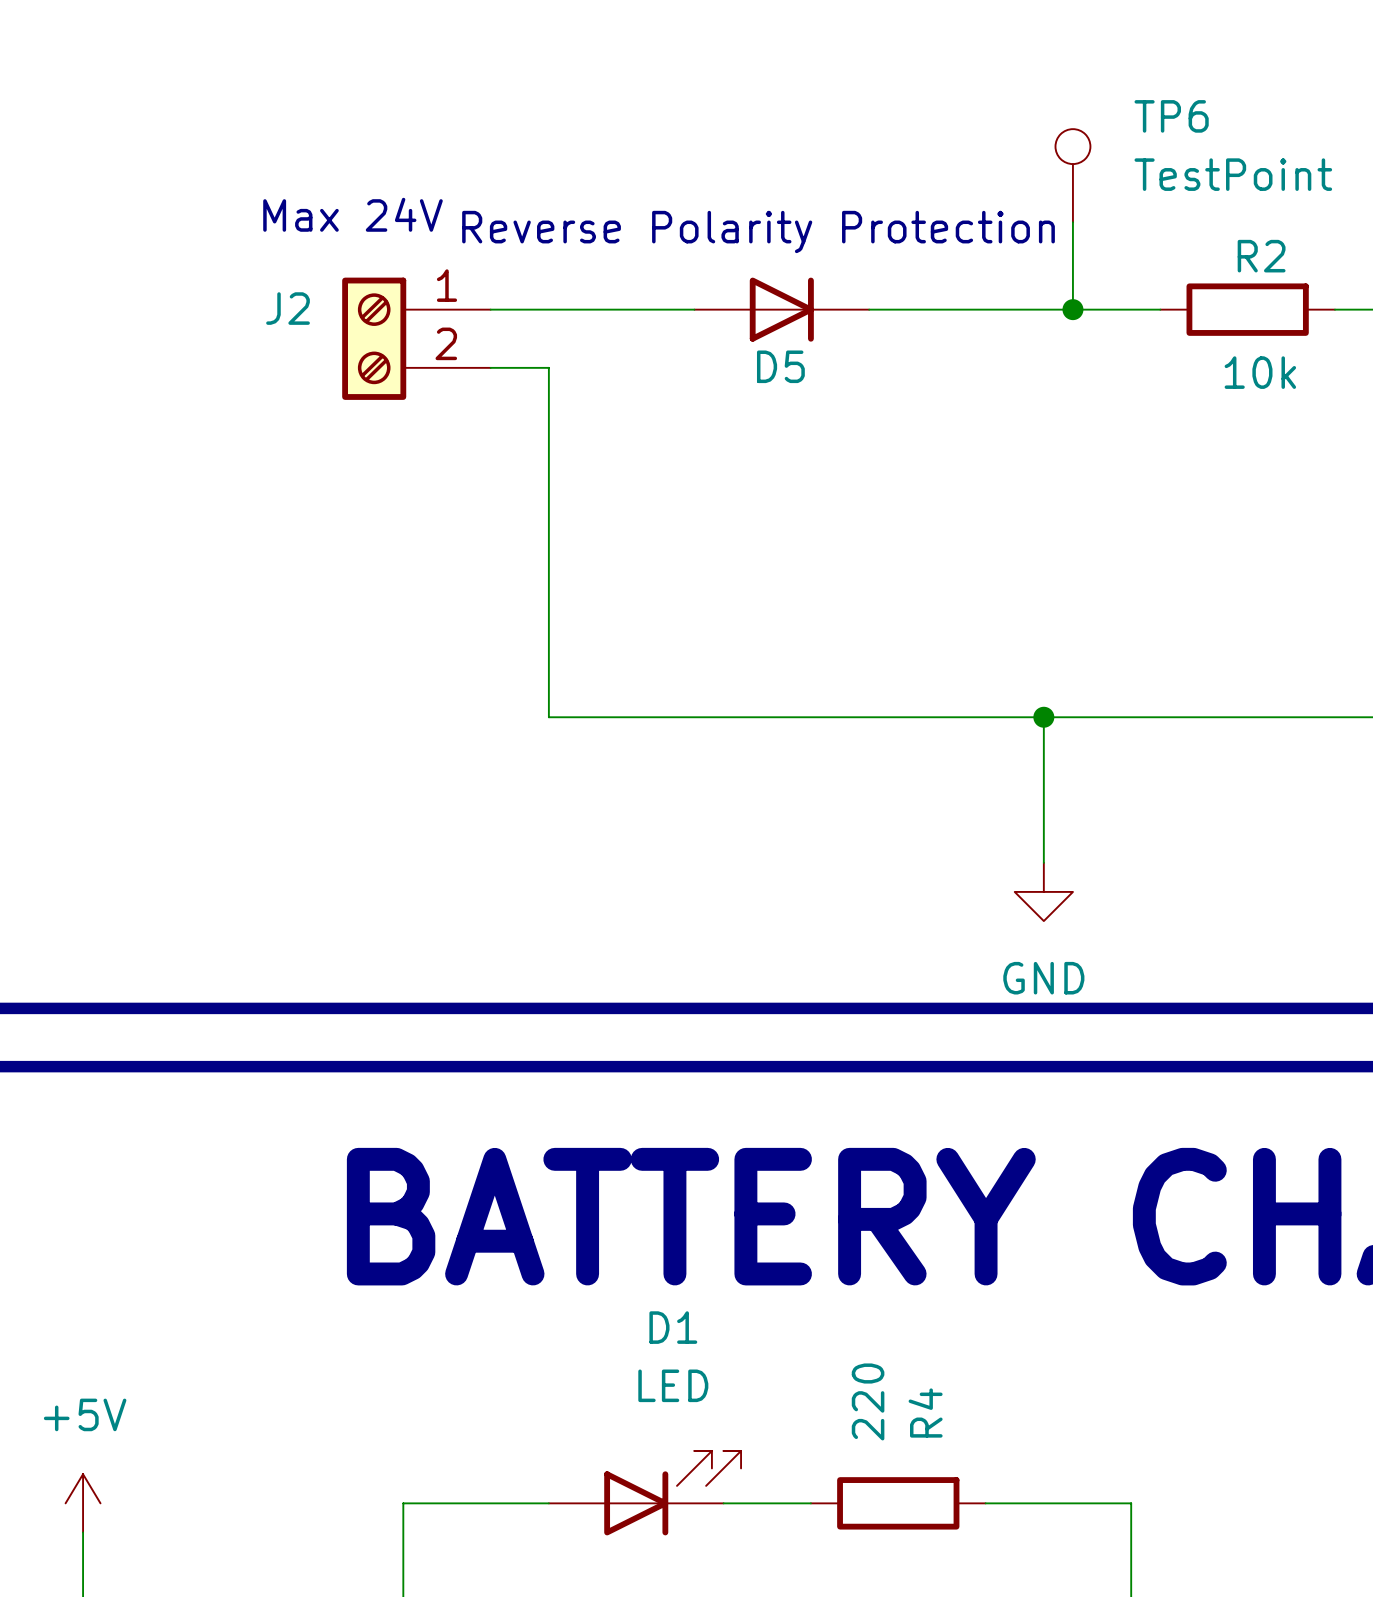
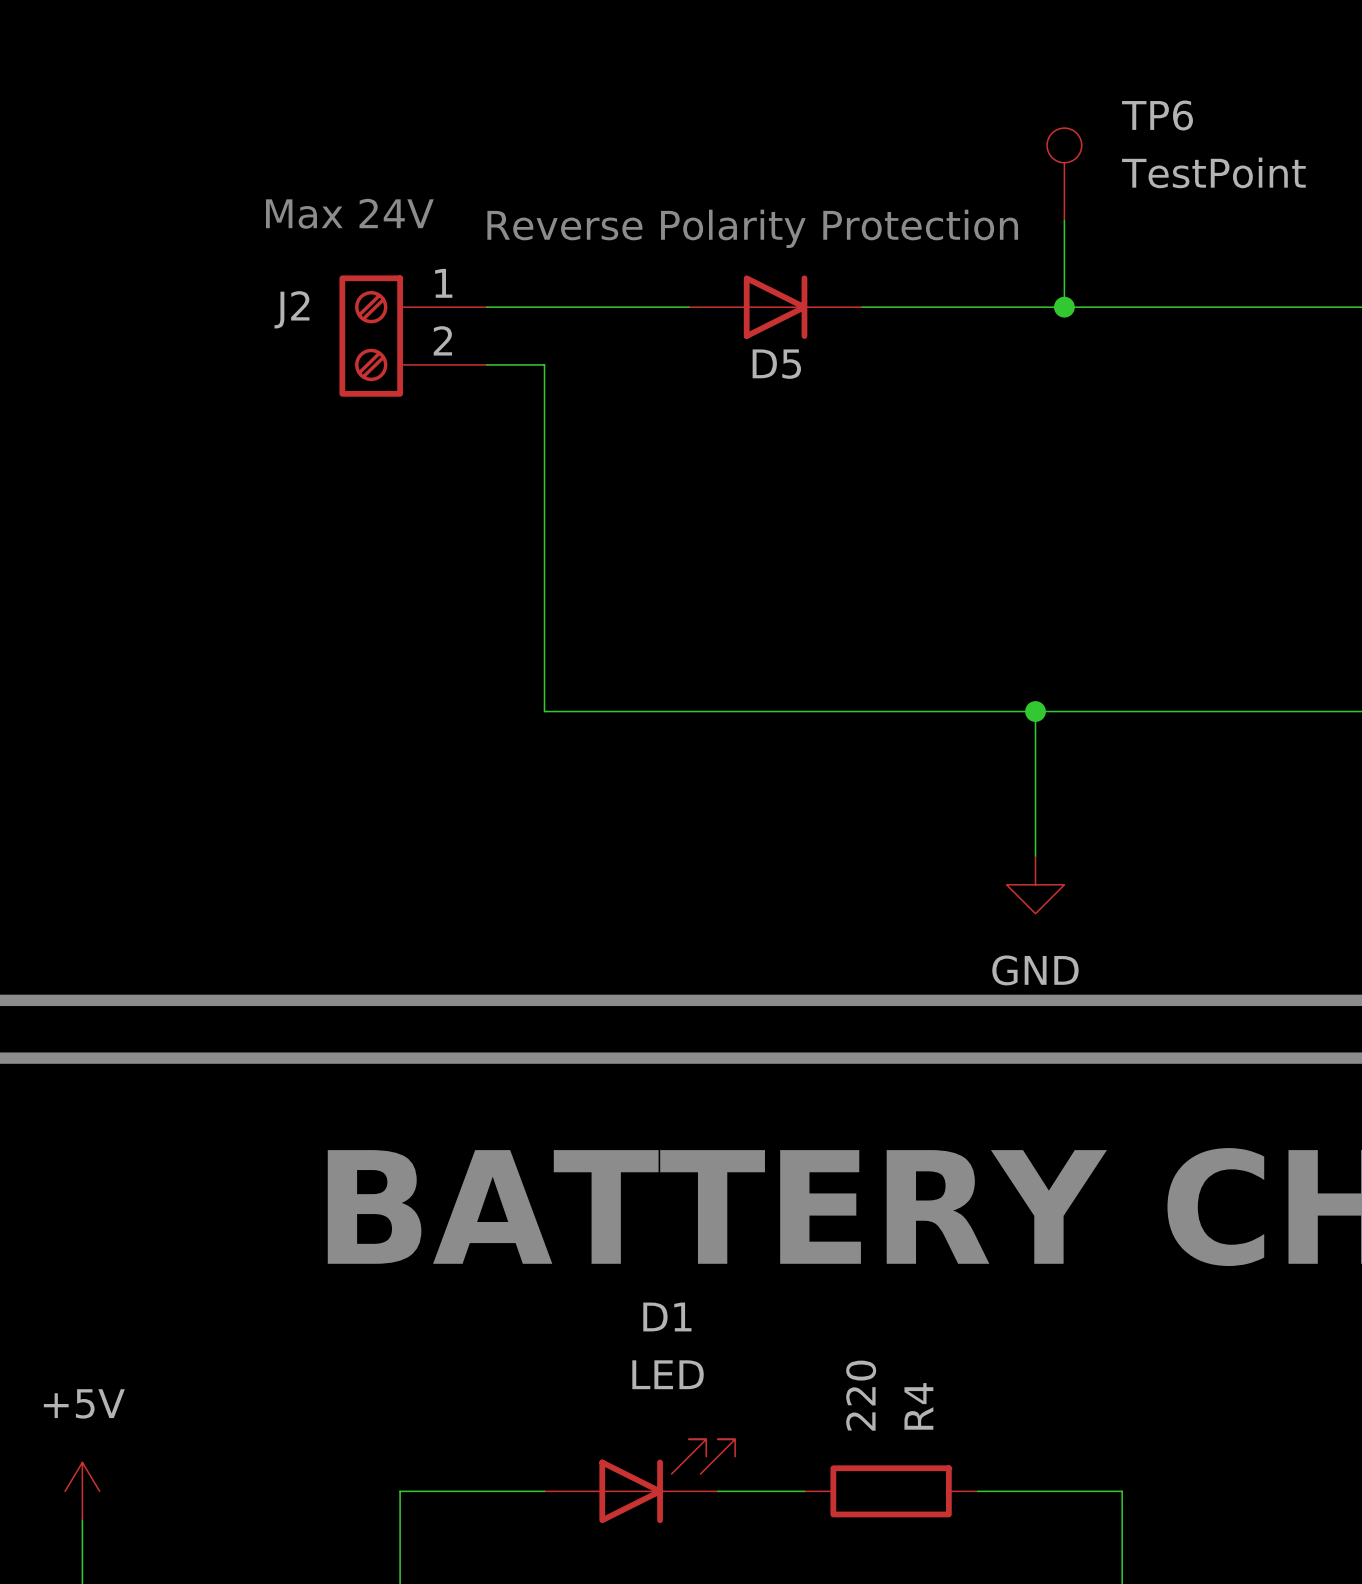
wire: none -> (1151, 307) (1324, 307)
R2: 10k (1247, 309) -> none

